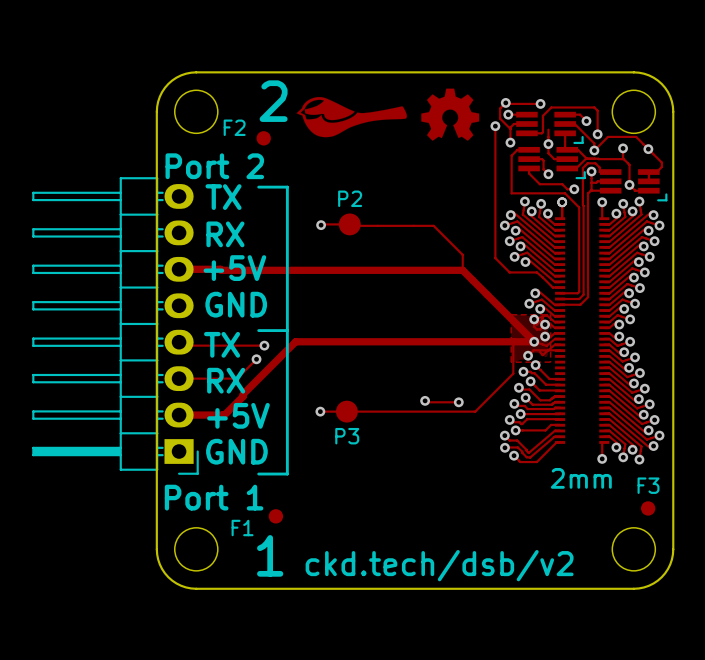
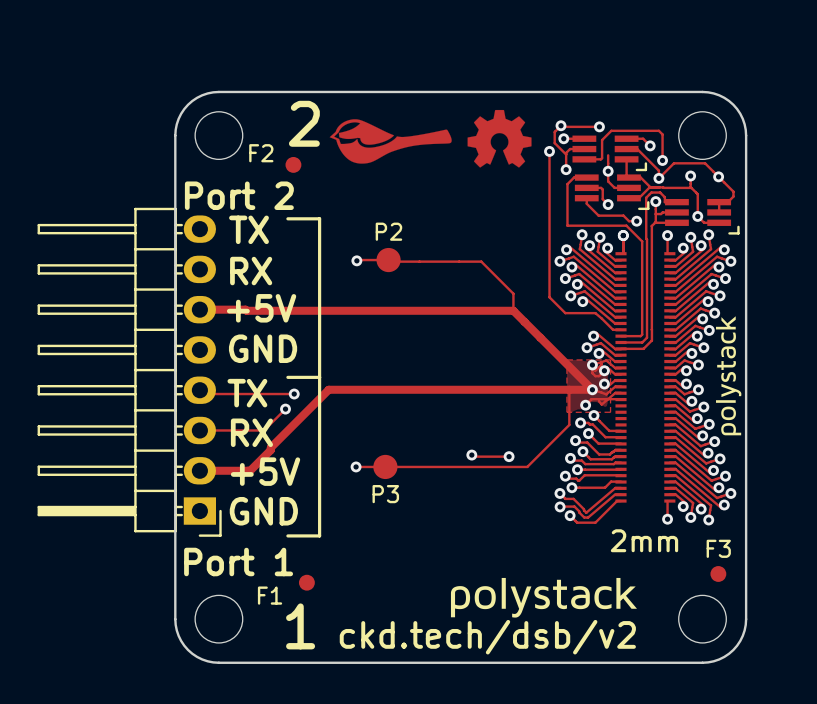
drawing: none -> [715, 316, 742, 436]
drawing: none -> [450, 577, 637, 618]

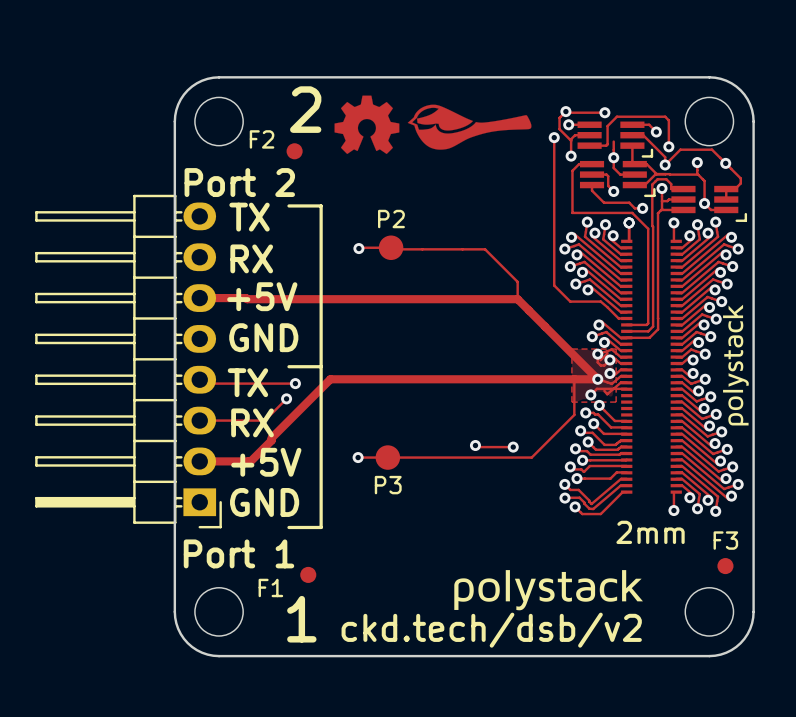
drawing position: (499, 138) -> (366, 124)
drawing position: (390, 141) -> (469, 127)

